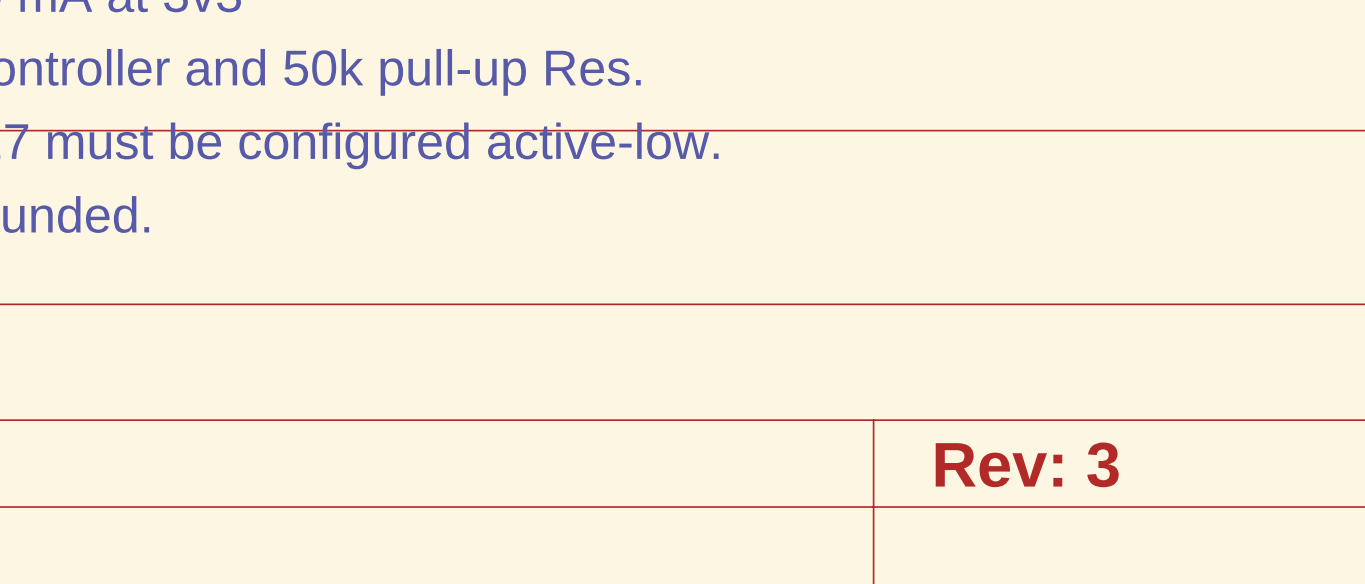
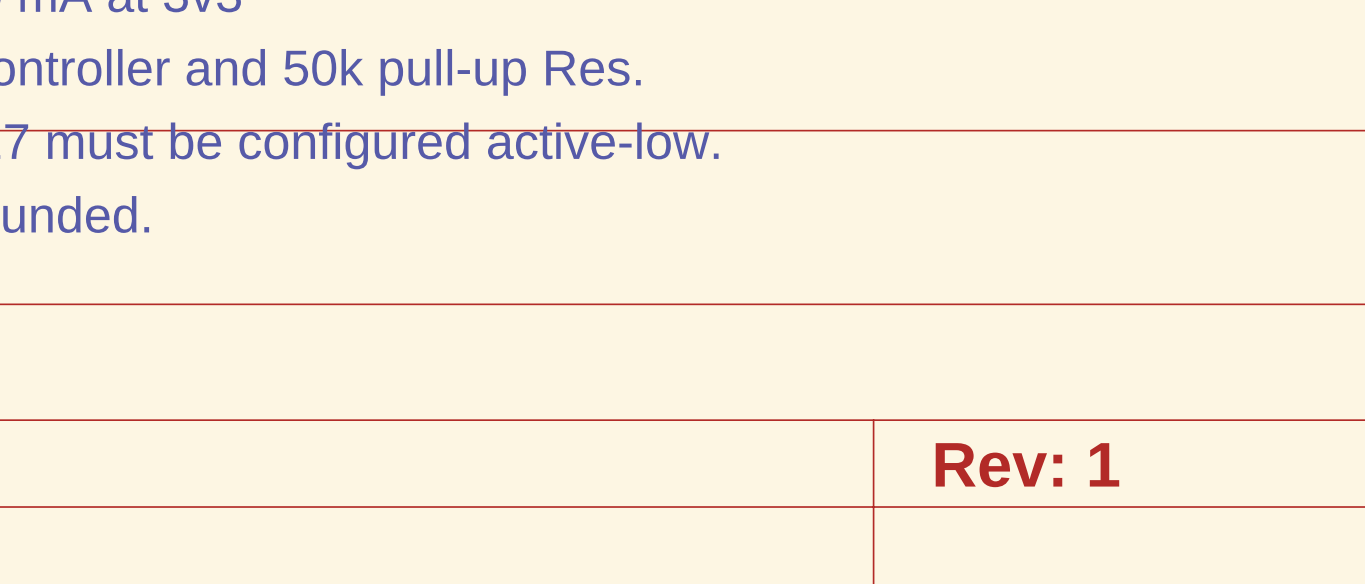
title block: Rev: 3 (1027, 464) -> Rev: 1 (1027, 465)

